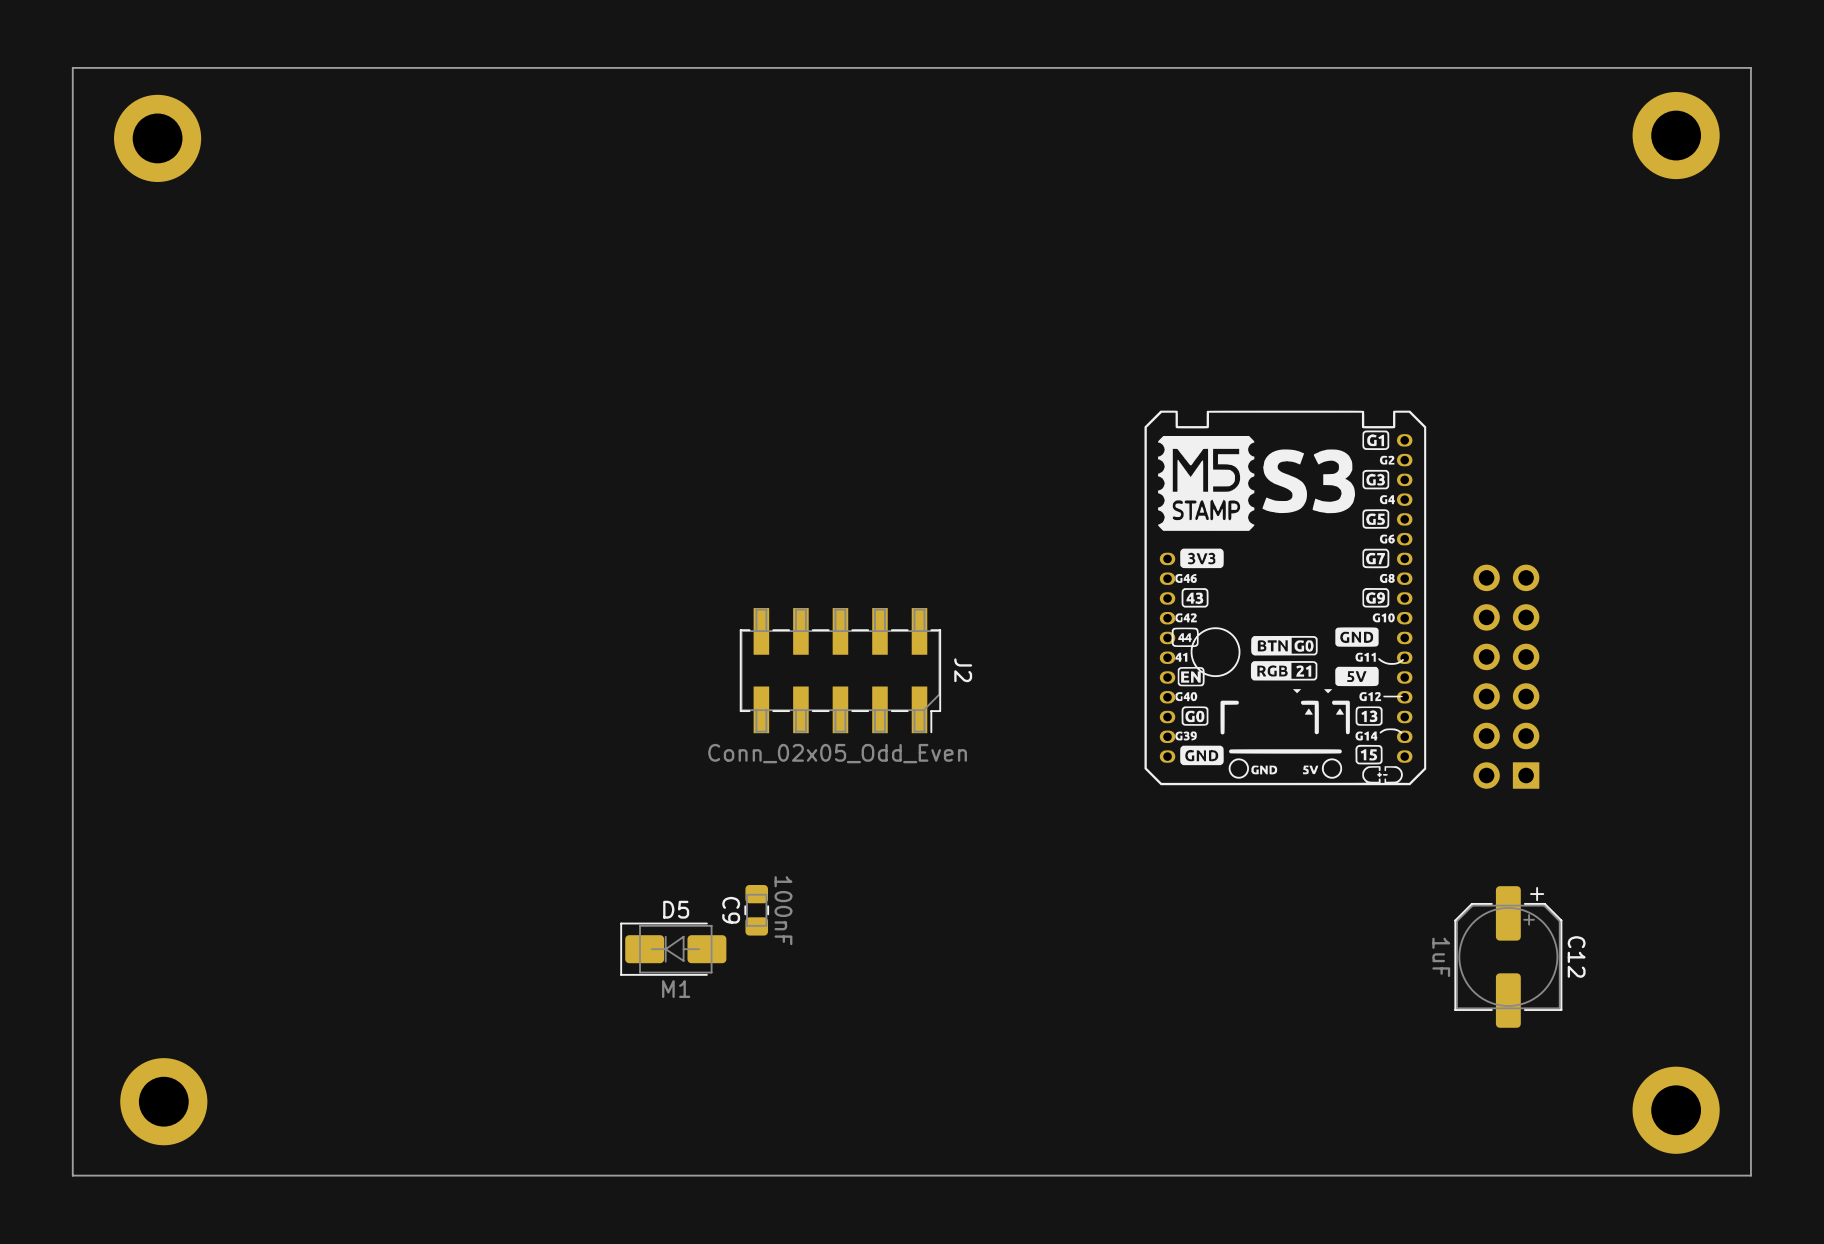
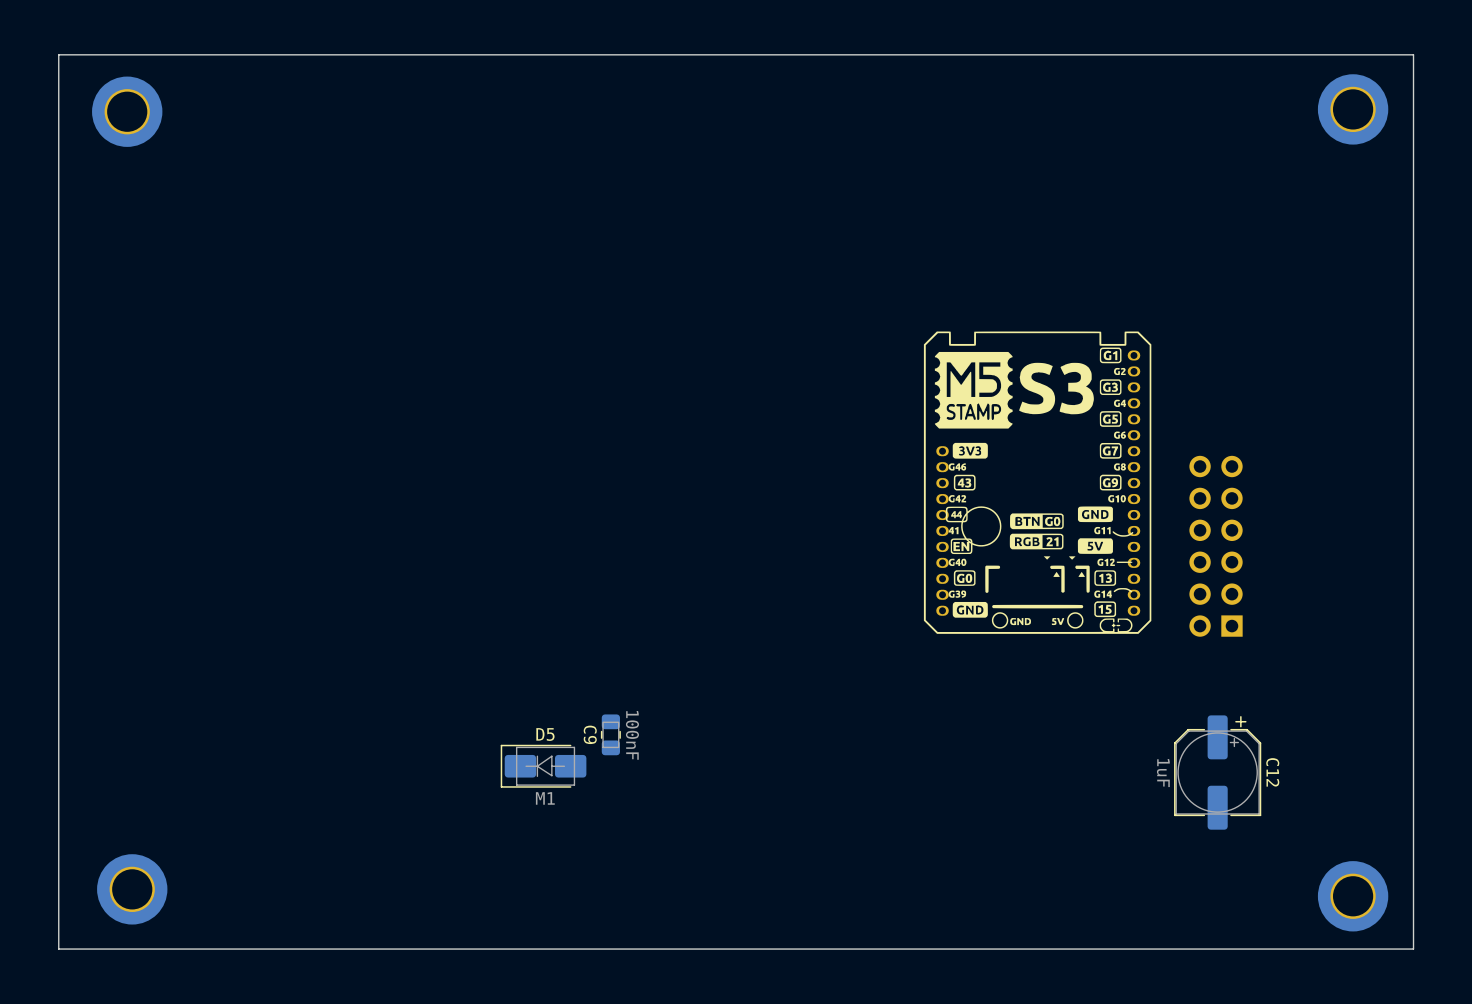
J2: Conn_02x05_Odd_Even (840, 670) -> none

